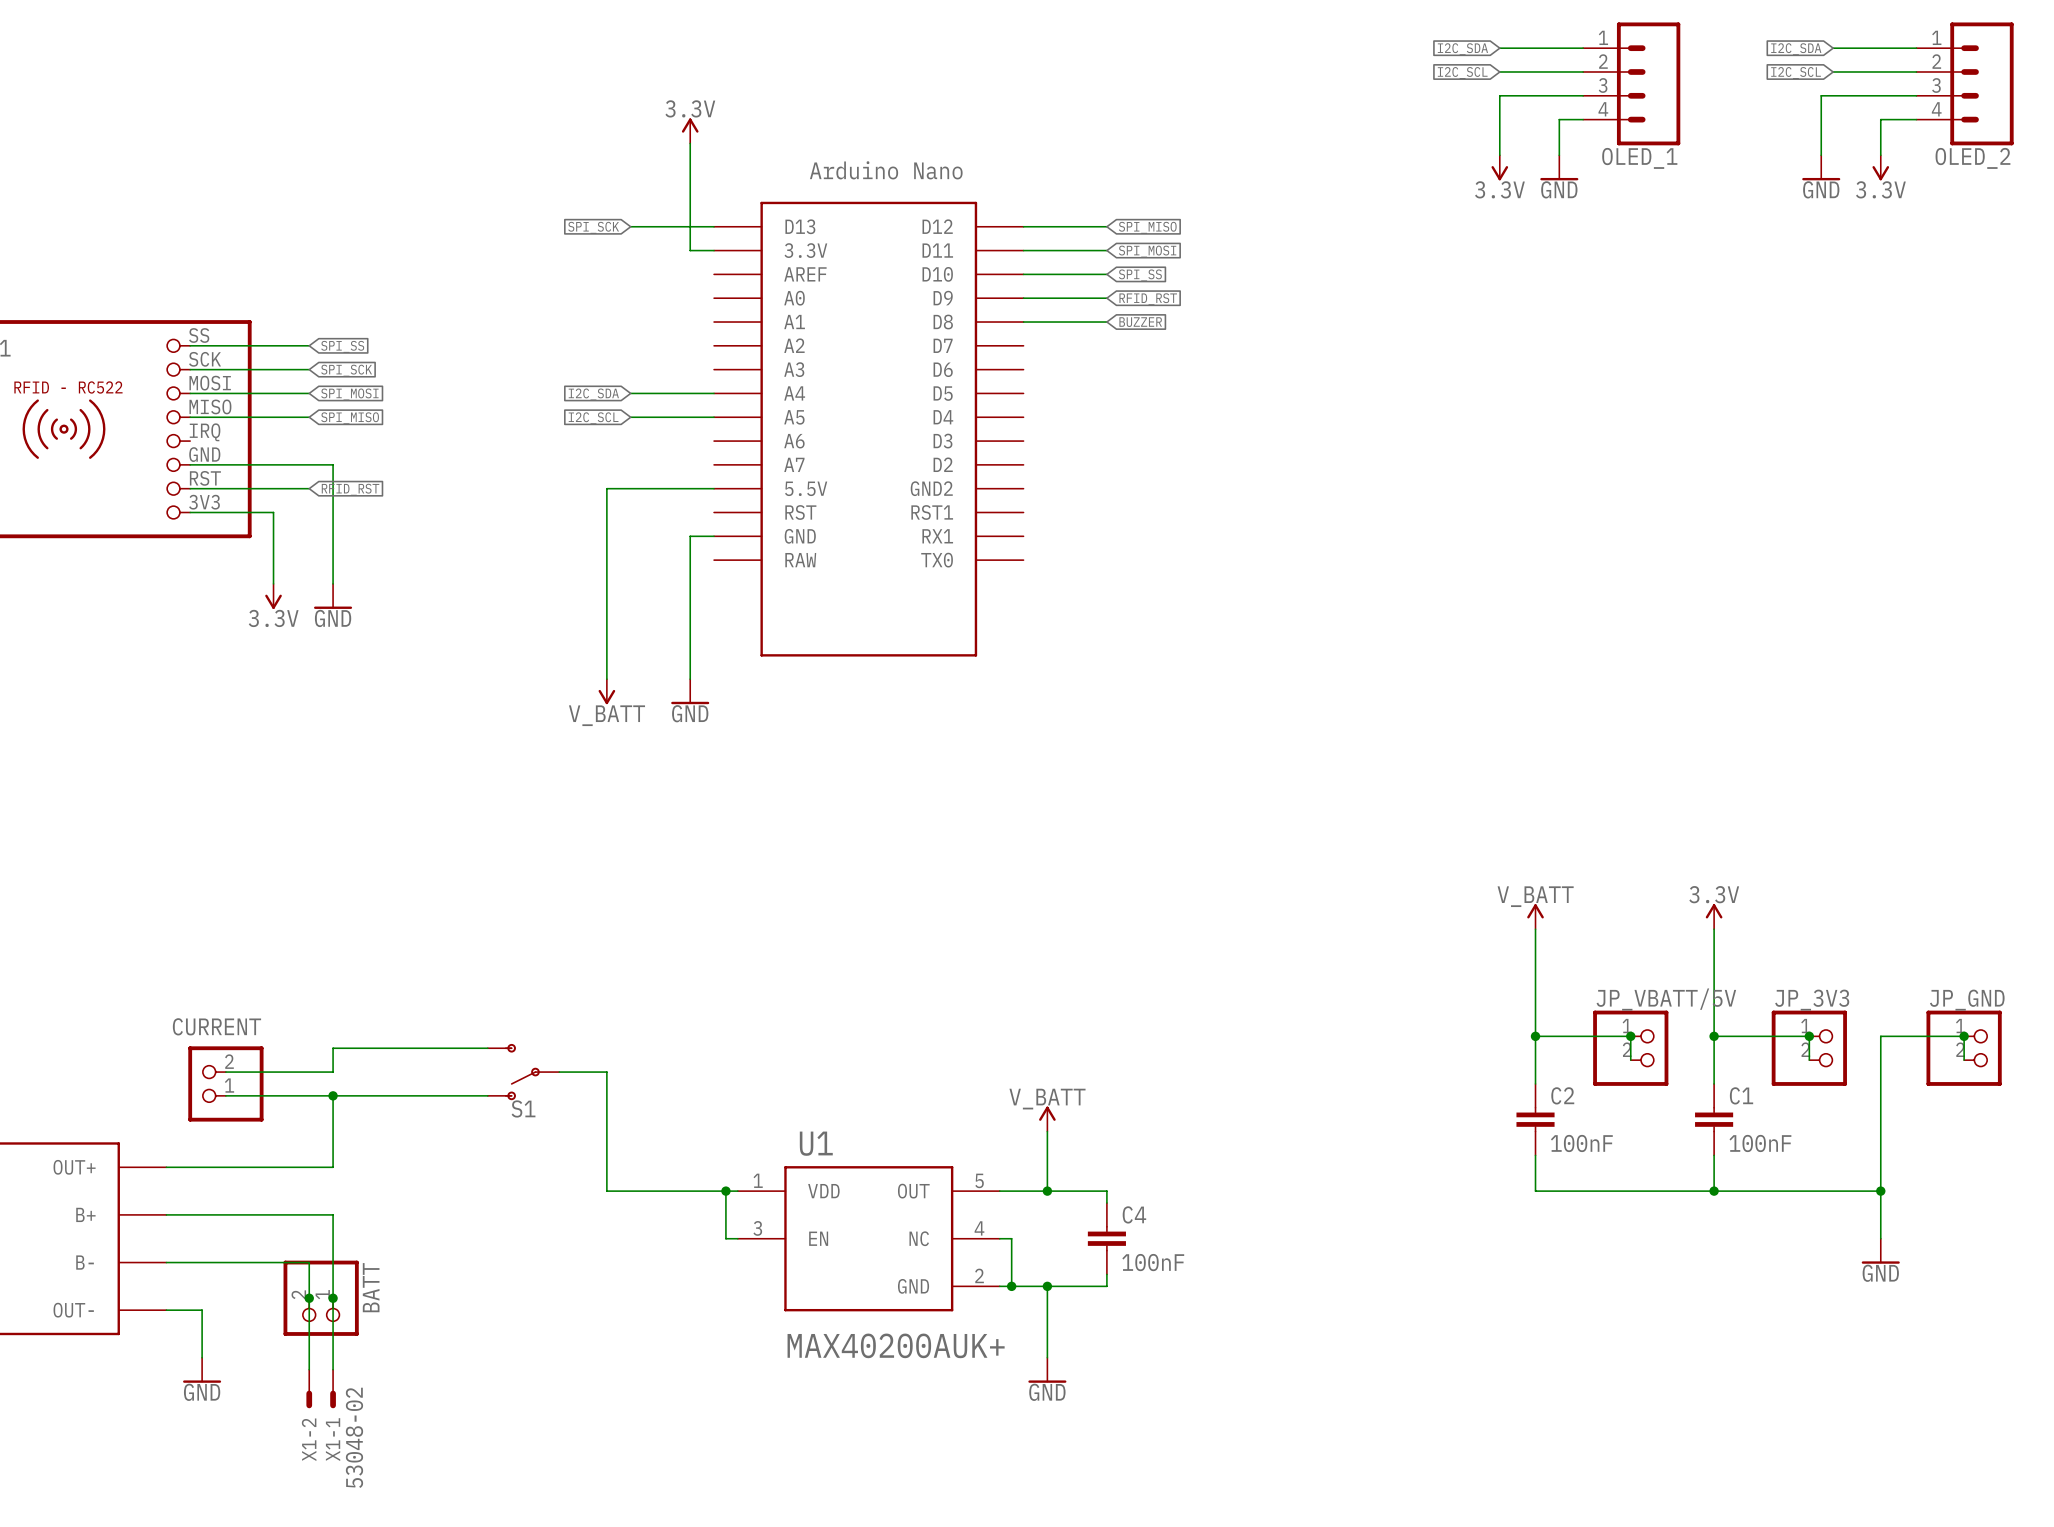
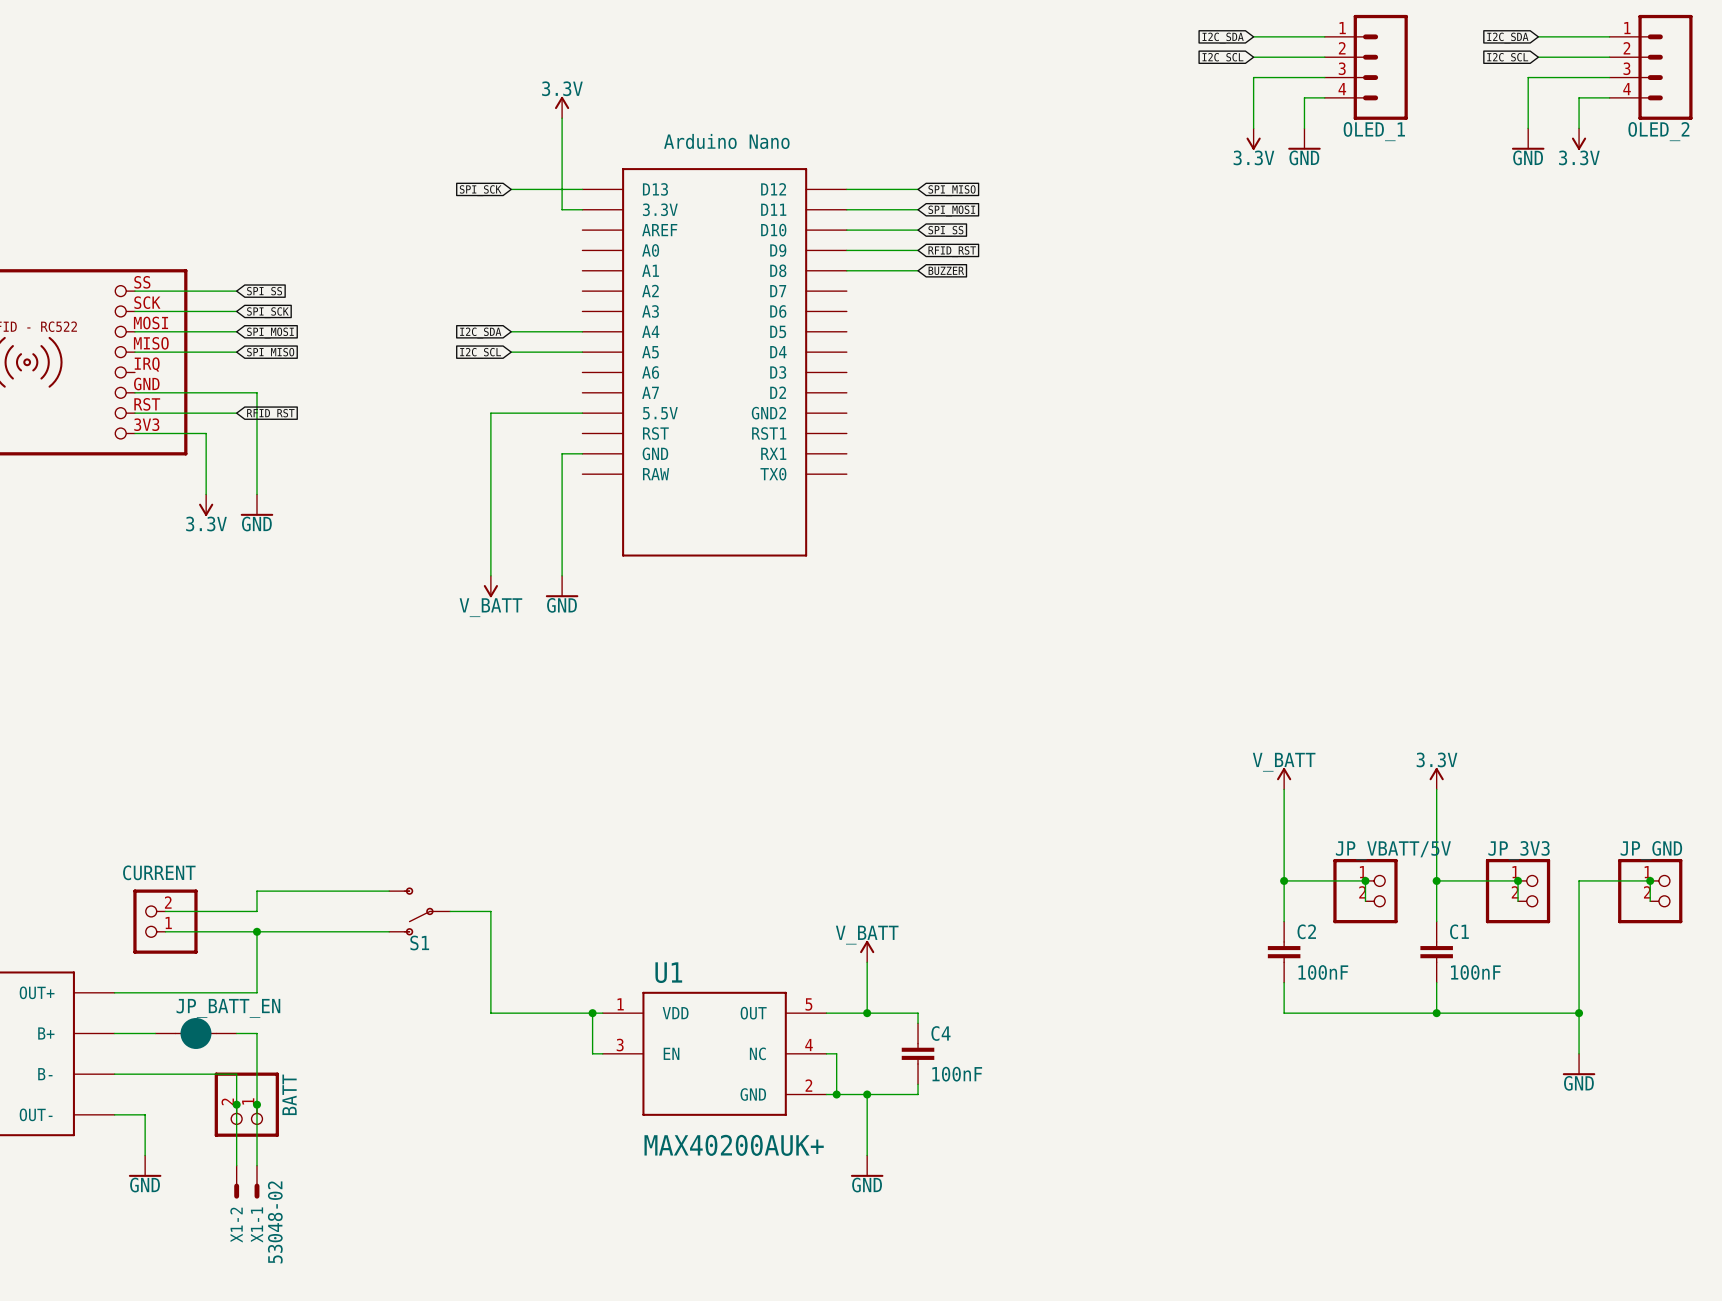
JP_BATT_EN: none -> (195, 1033)

